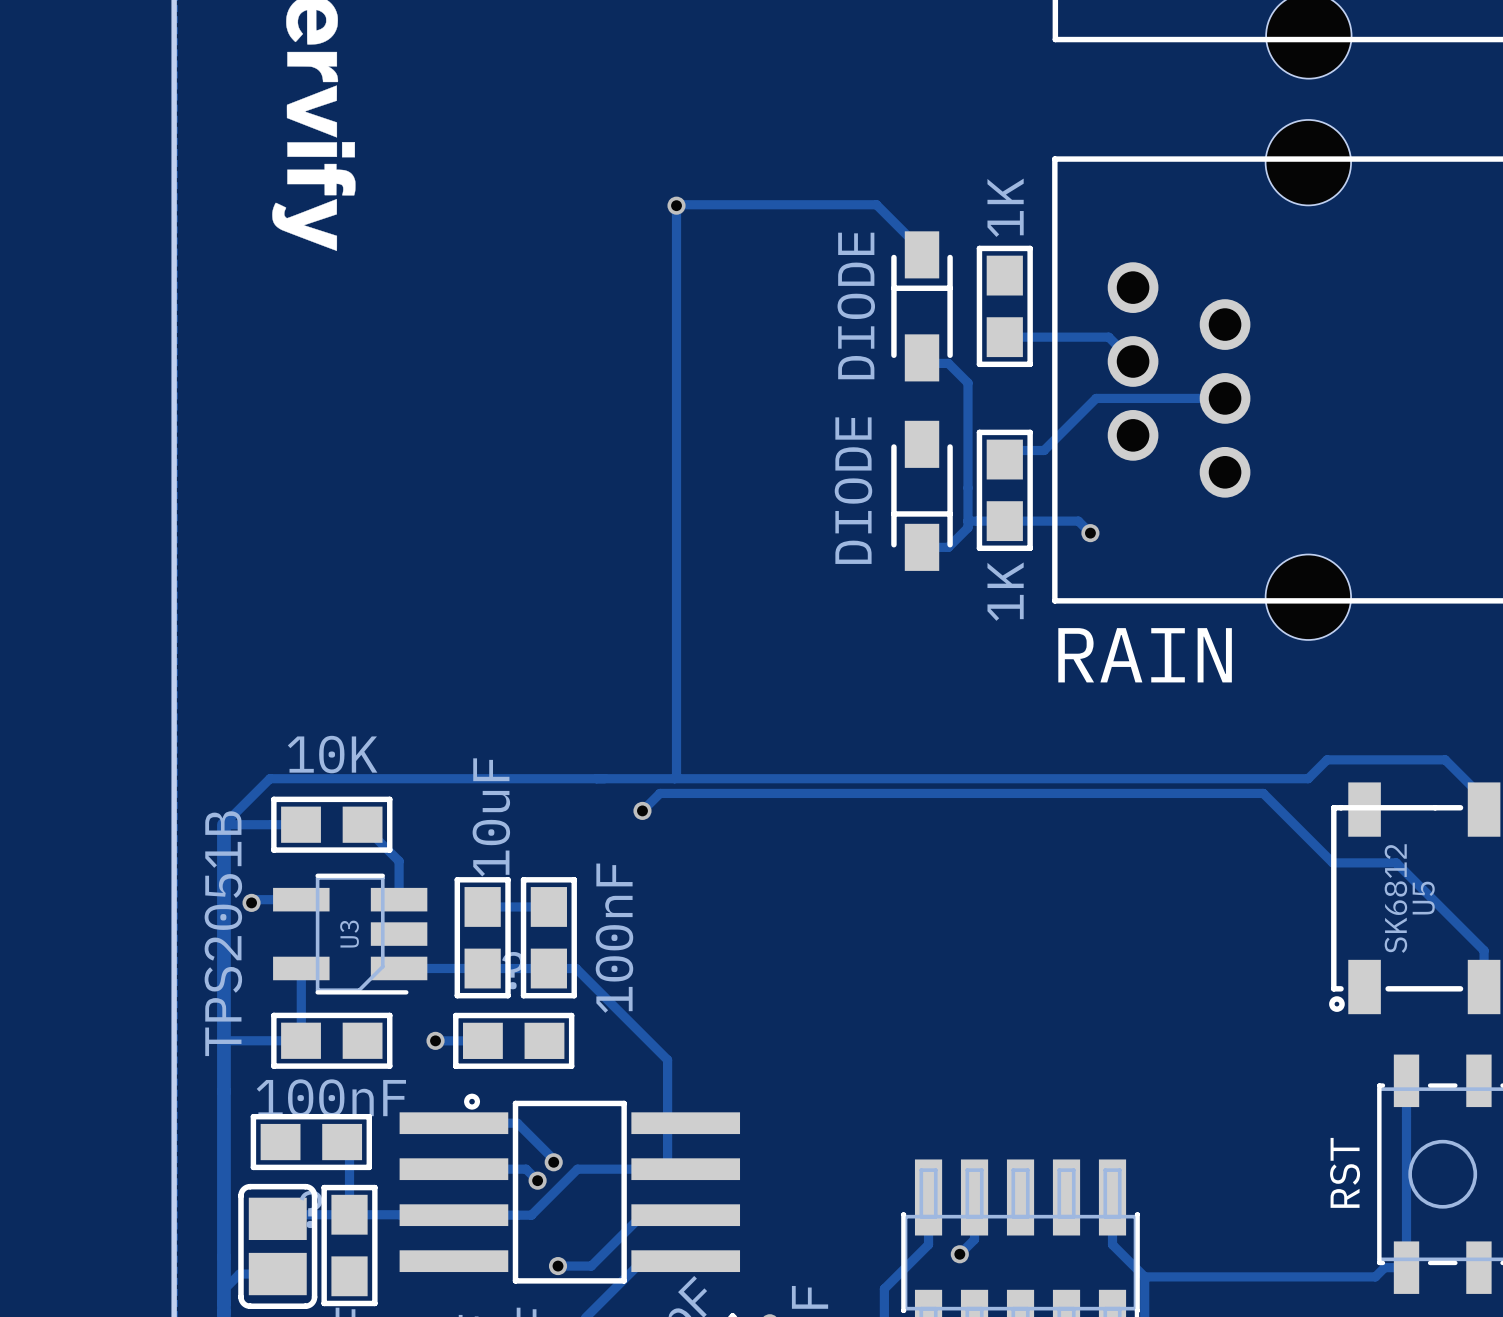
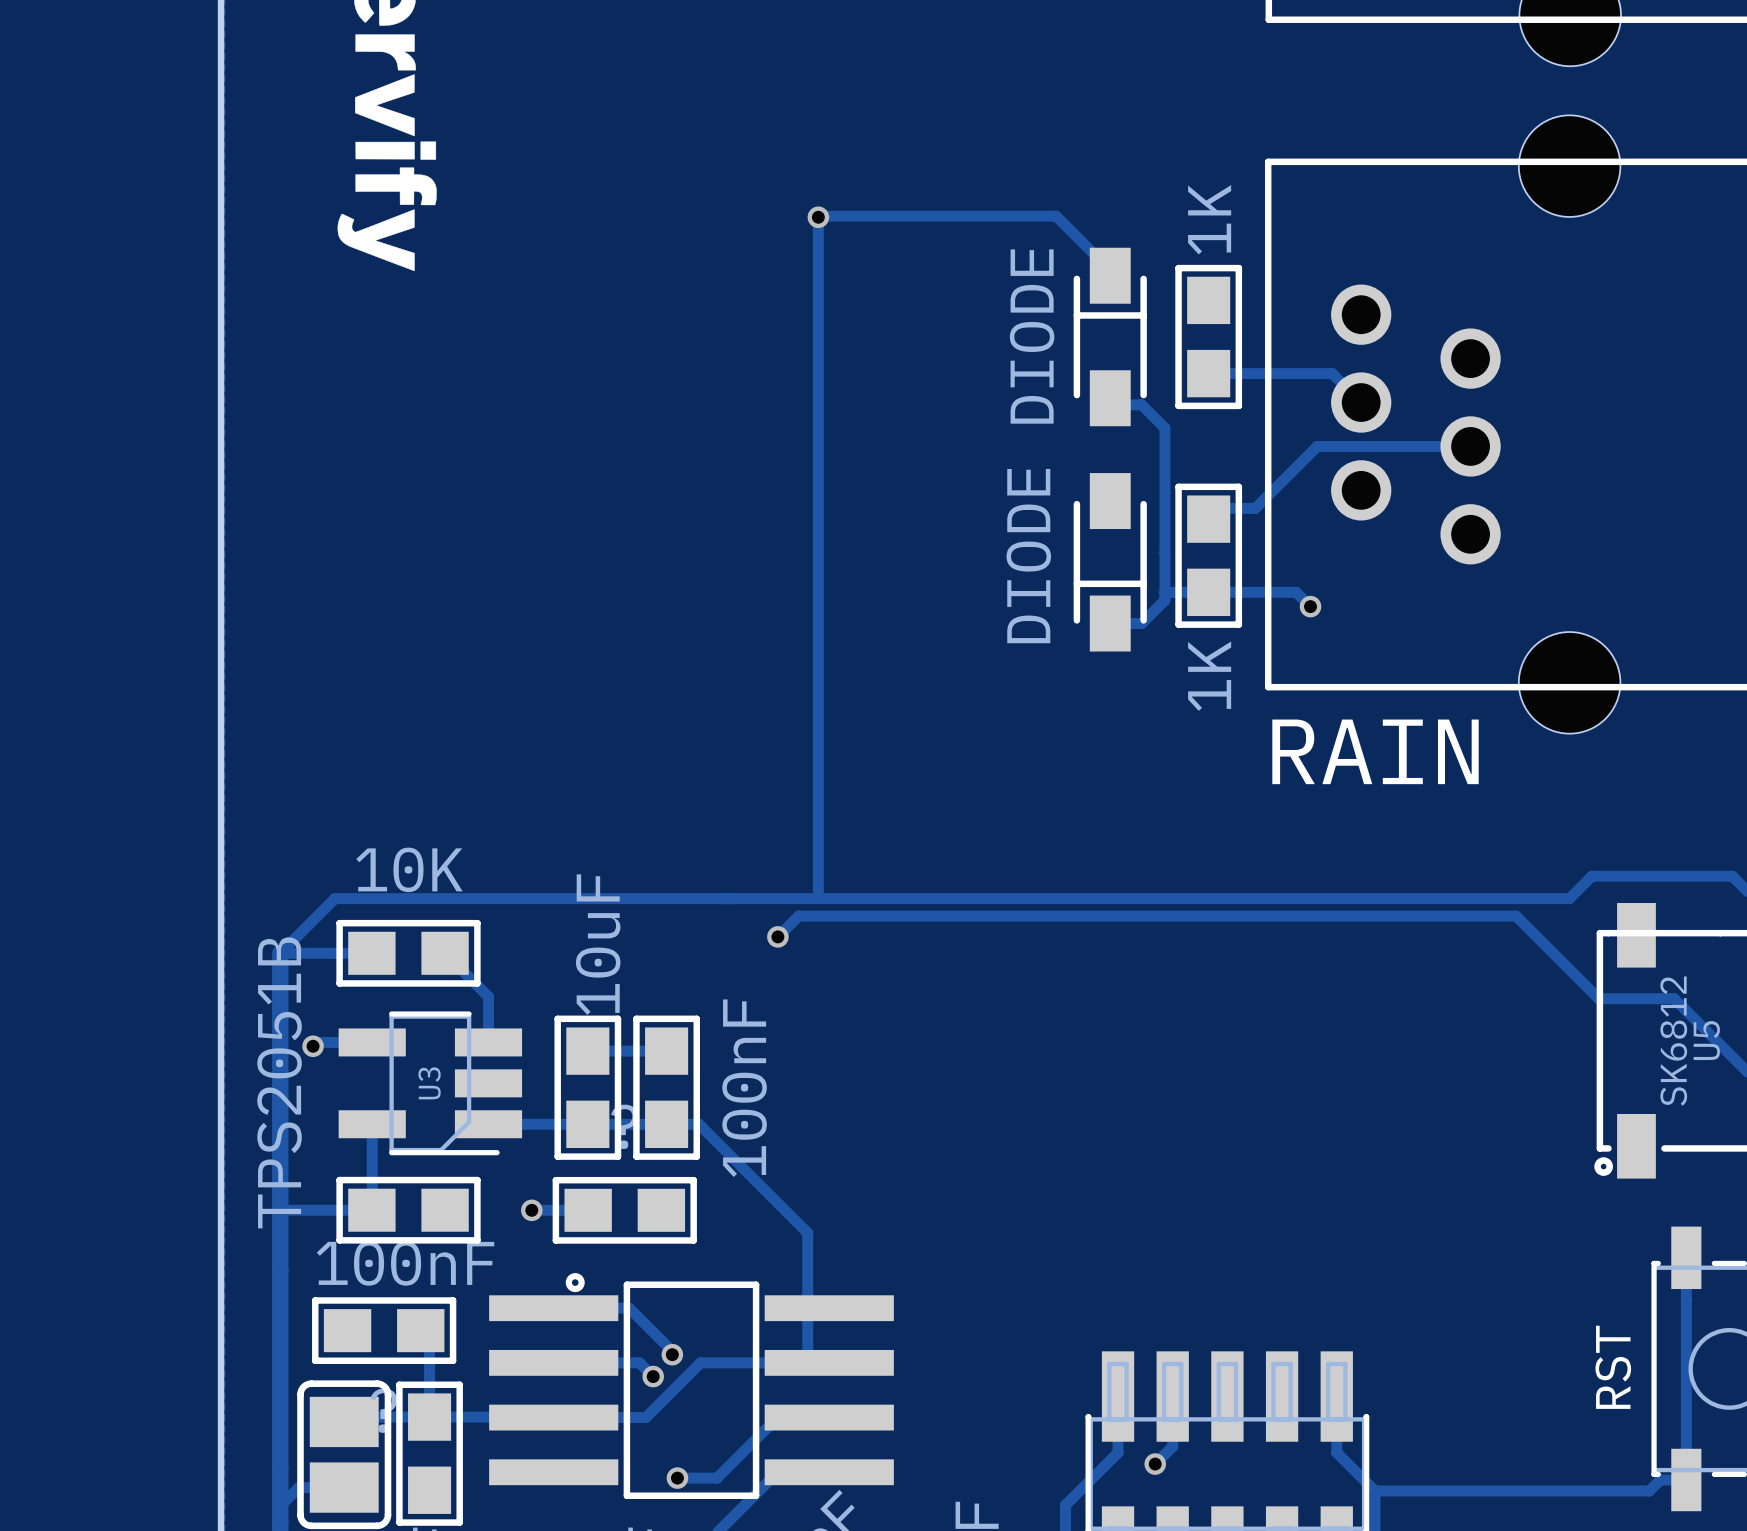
part value position: 100nF (331, 1098) -> 100nF (405, 1263)

